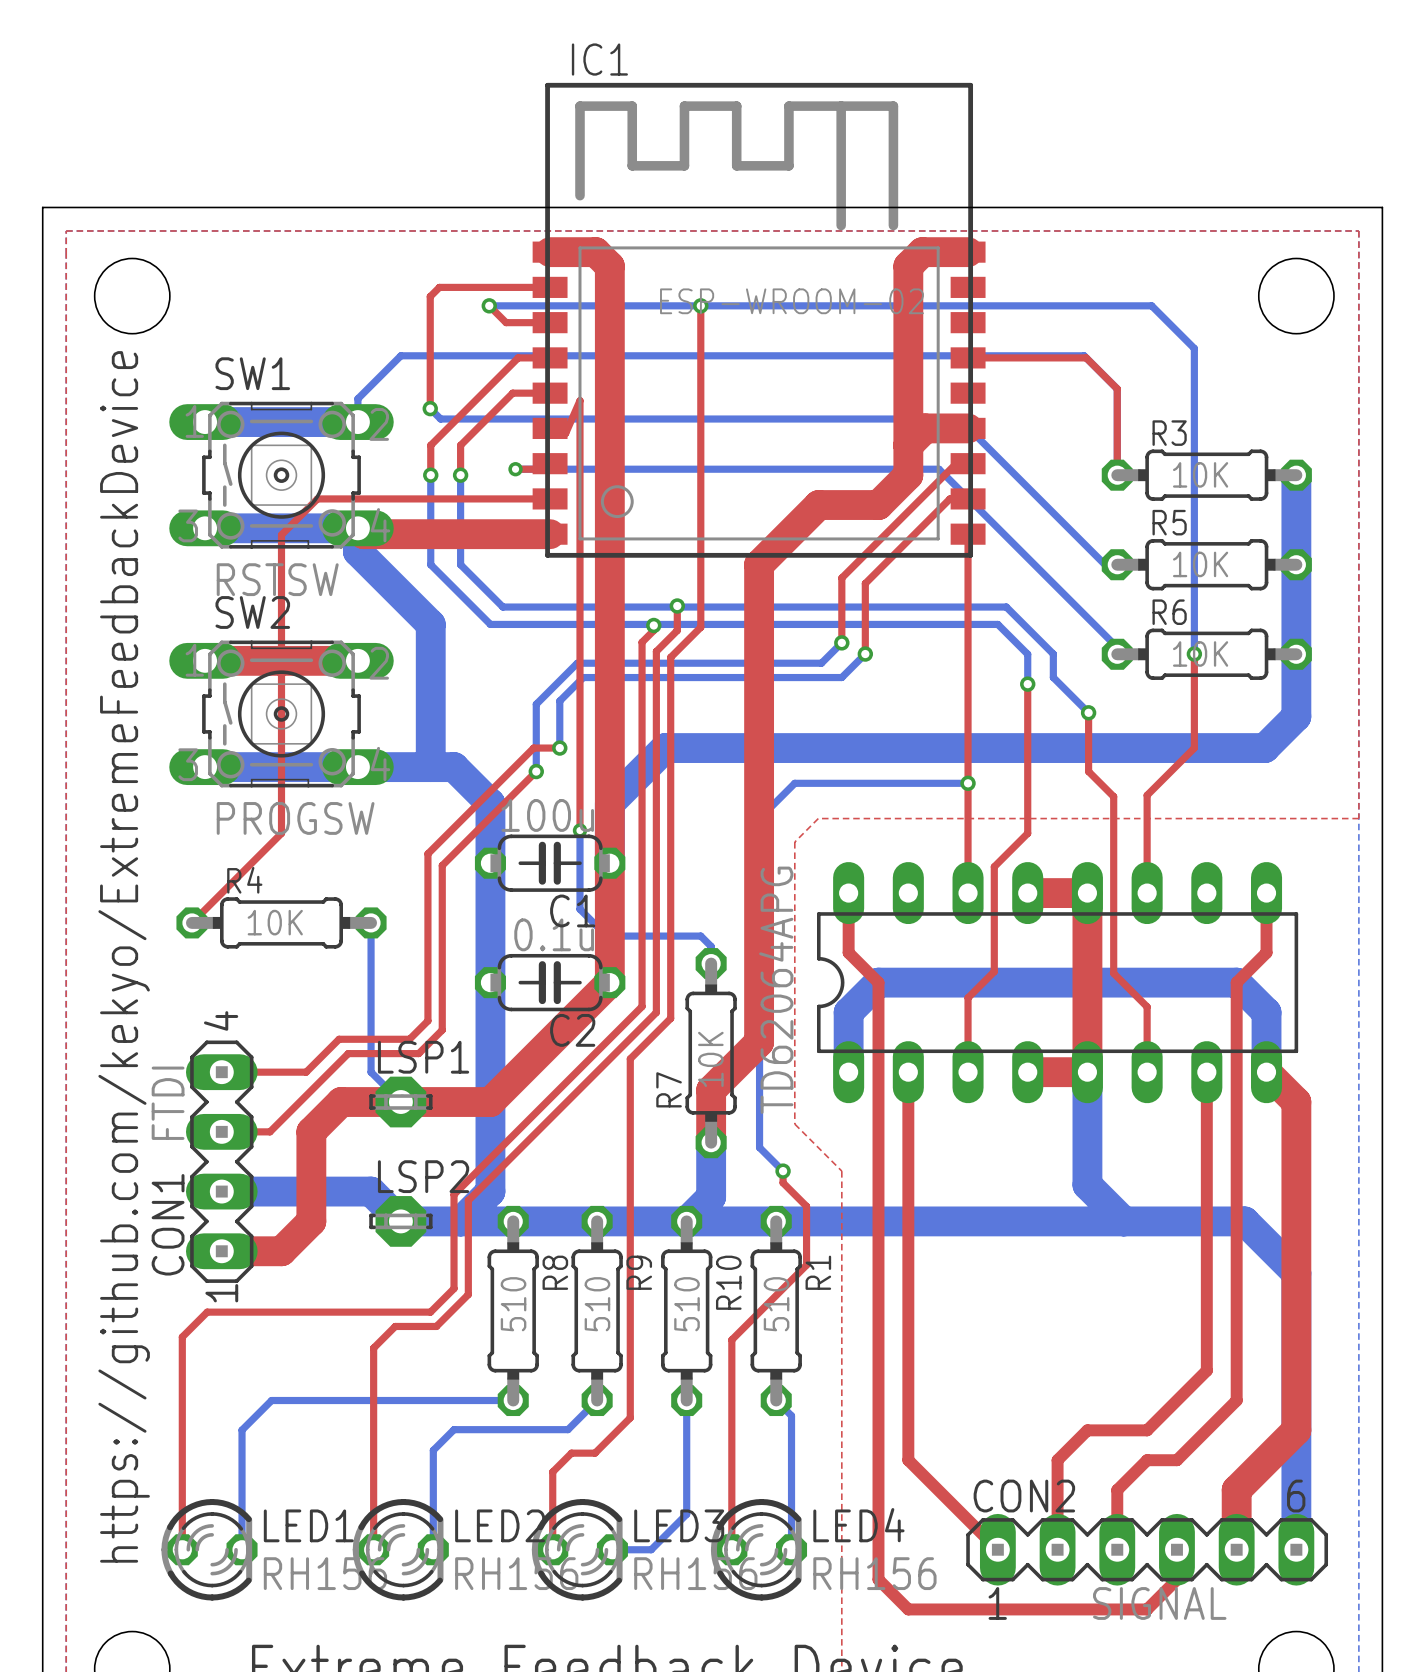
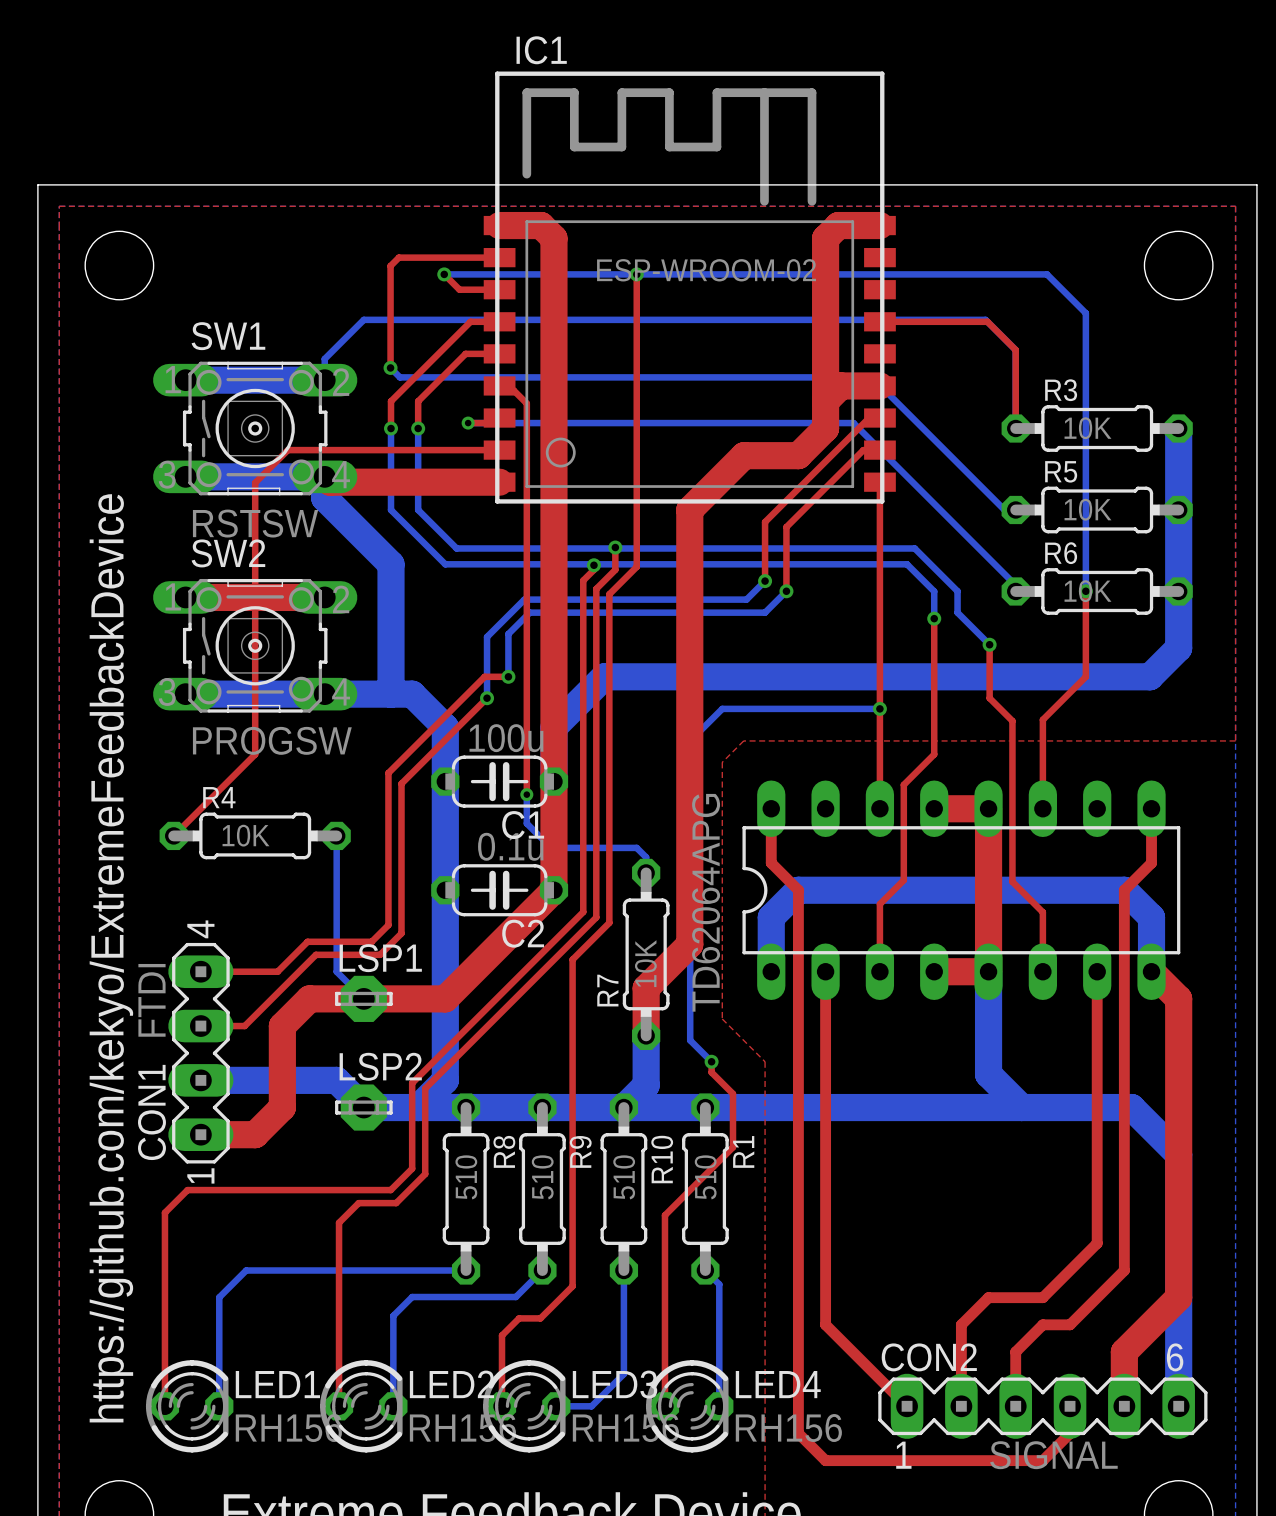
top track: (565, 433) (579, 400) (579, 447) -> (513, 390) (526, 403)
bottom track: (579, 830) (579, 877) -> none
top track: none -> (526, 751) (526, 794)
via position: (579, 830) -> (526, 794)

